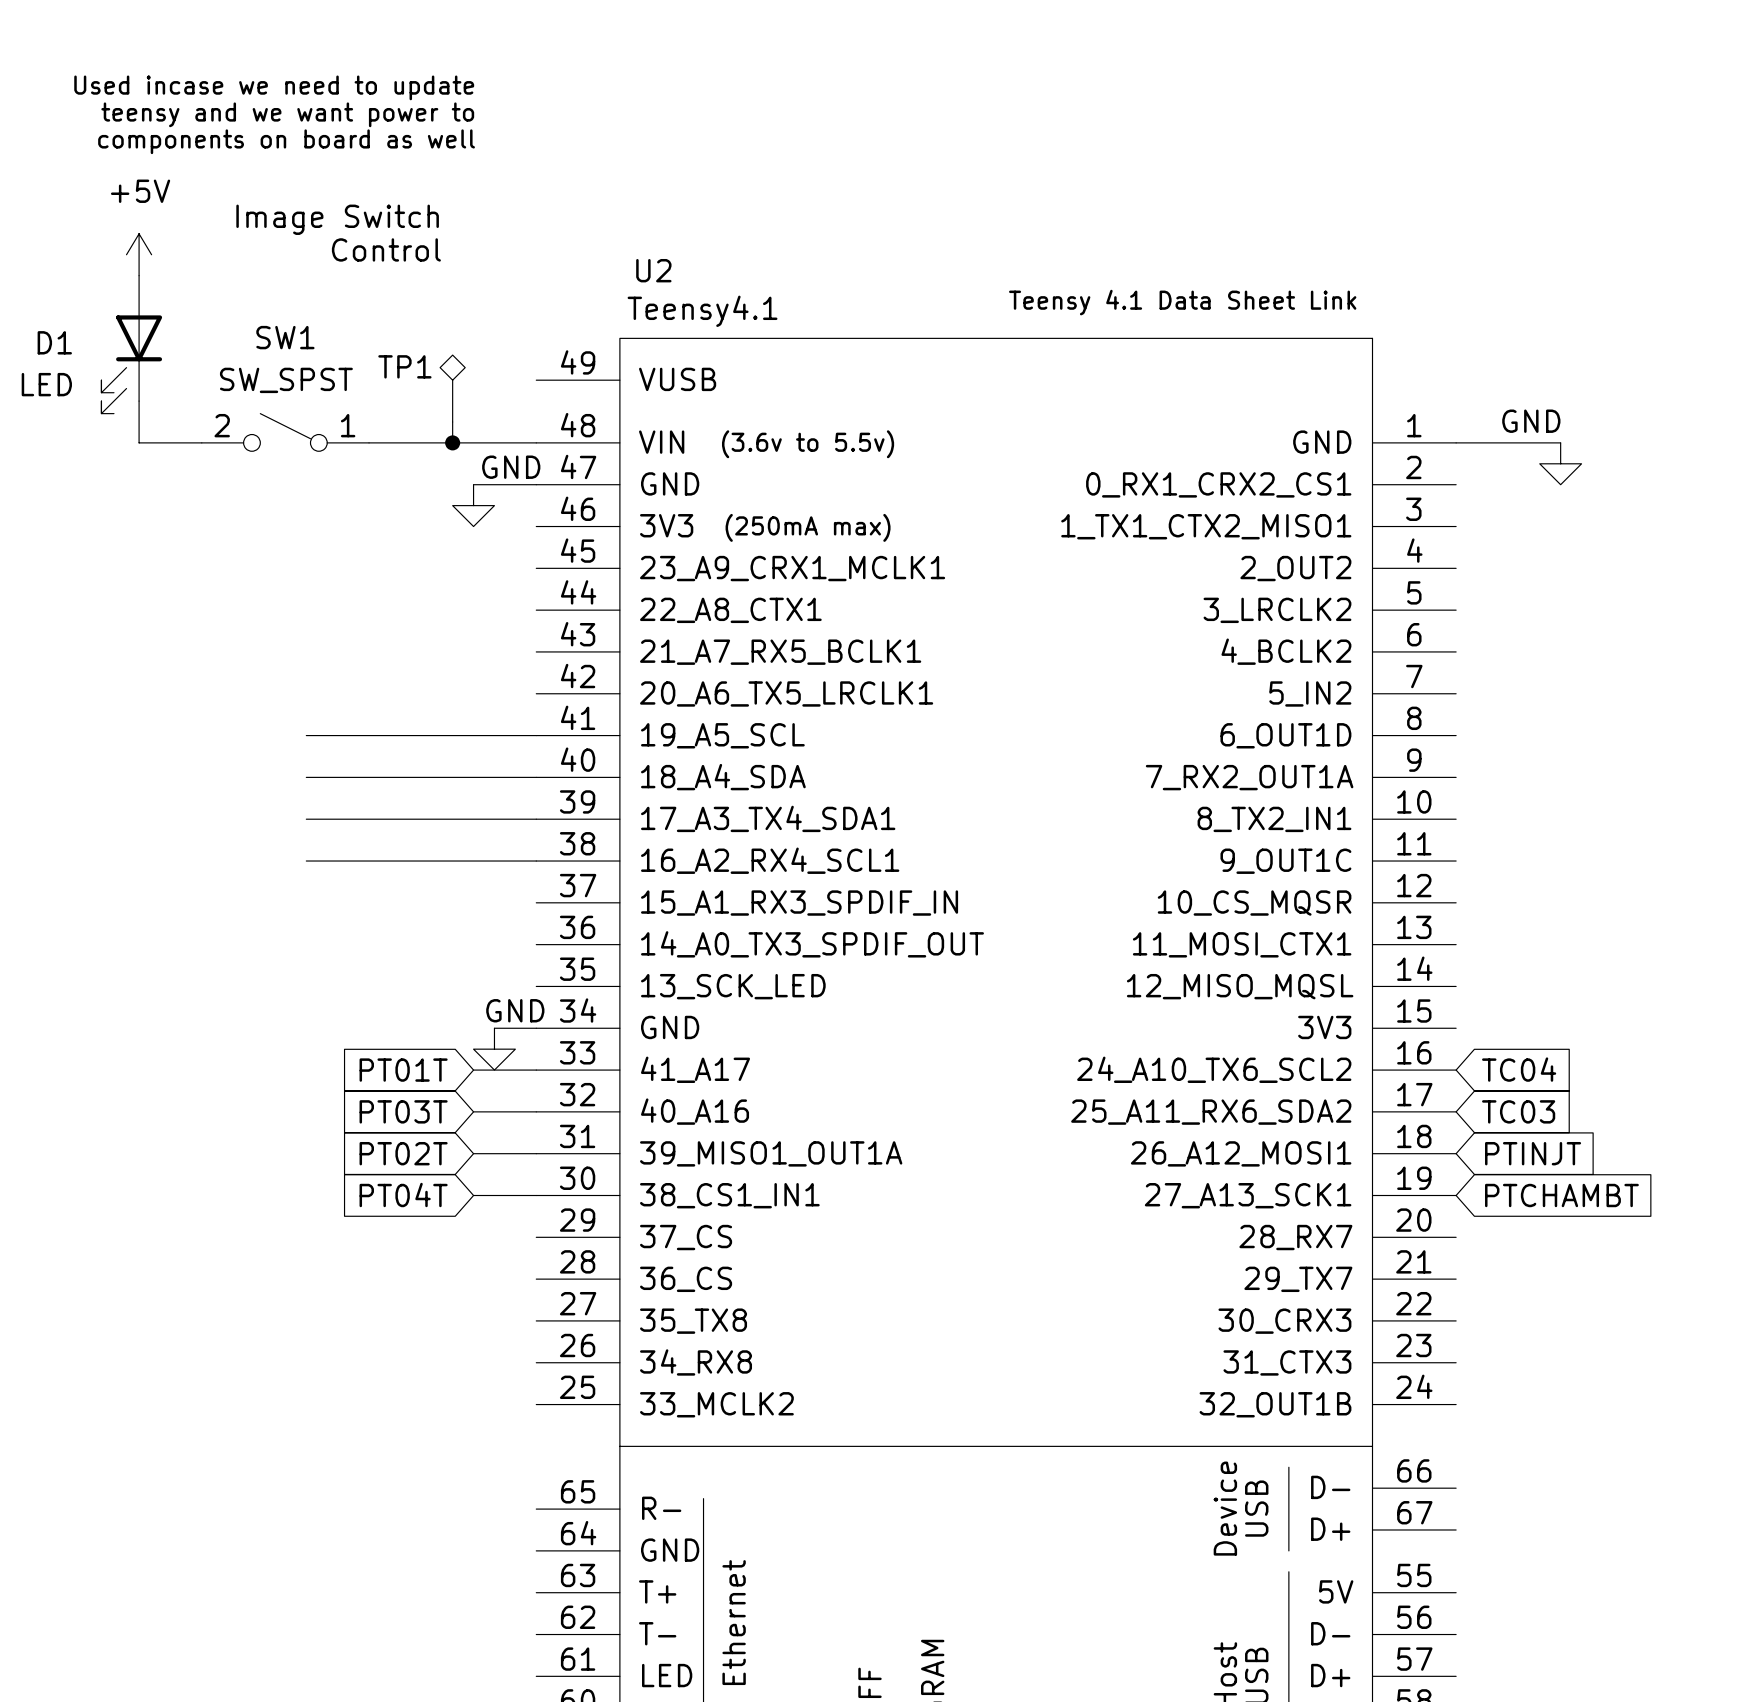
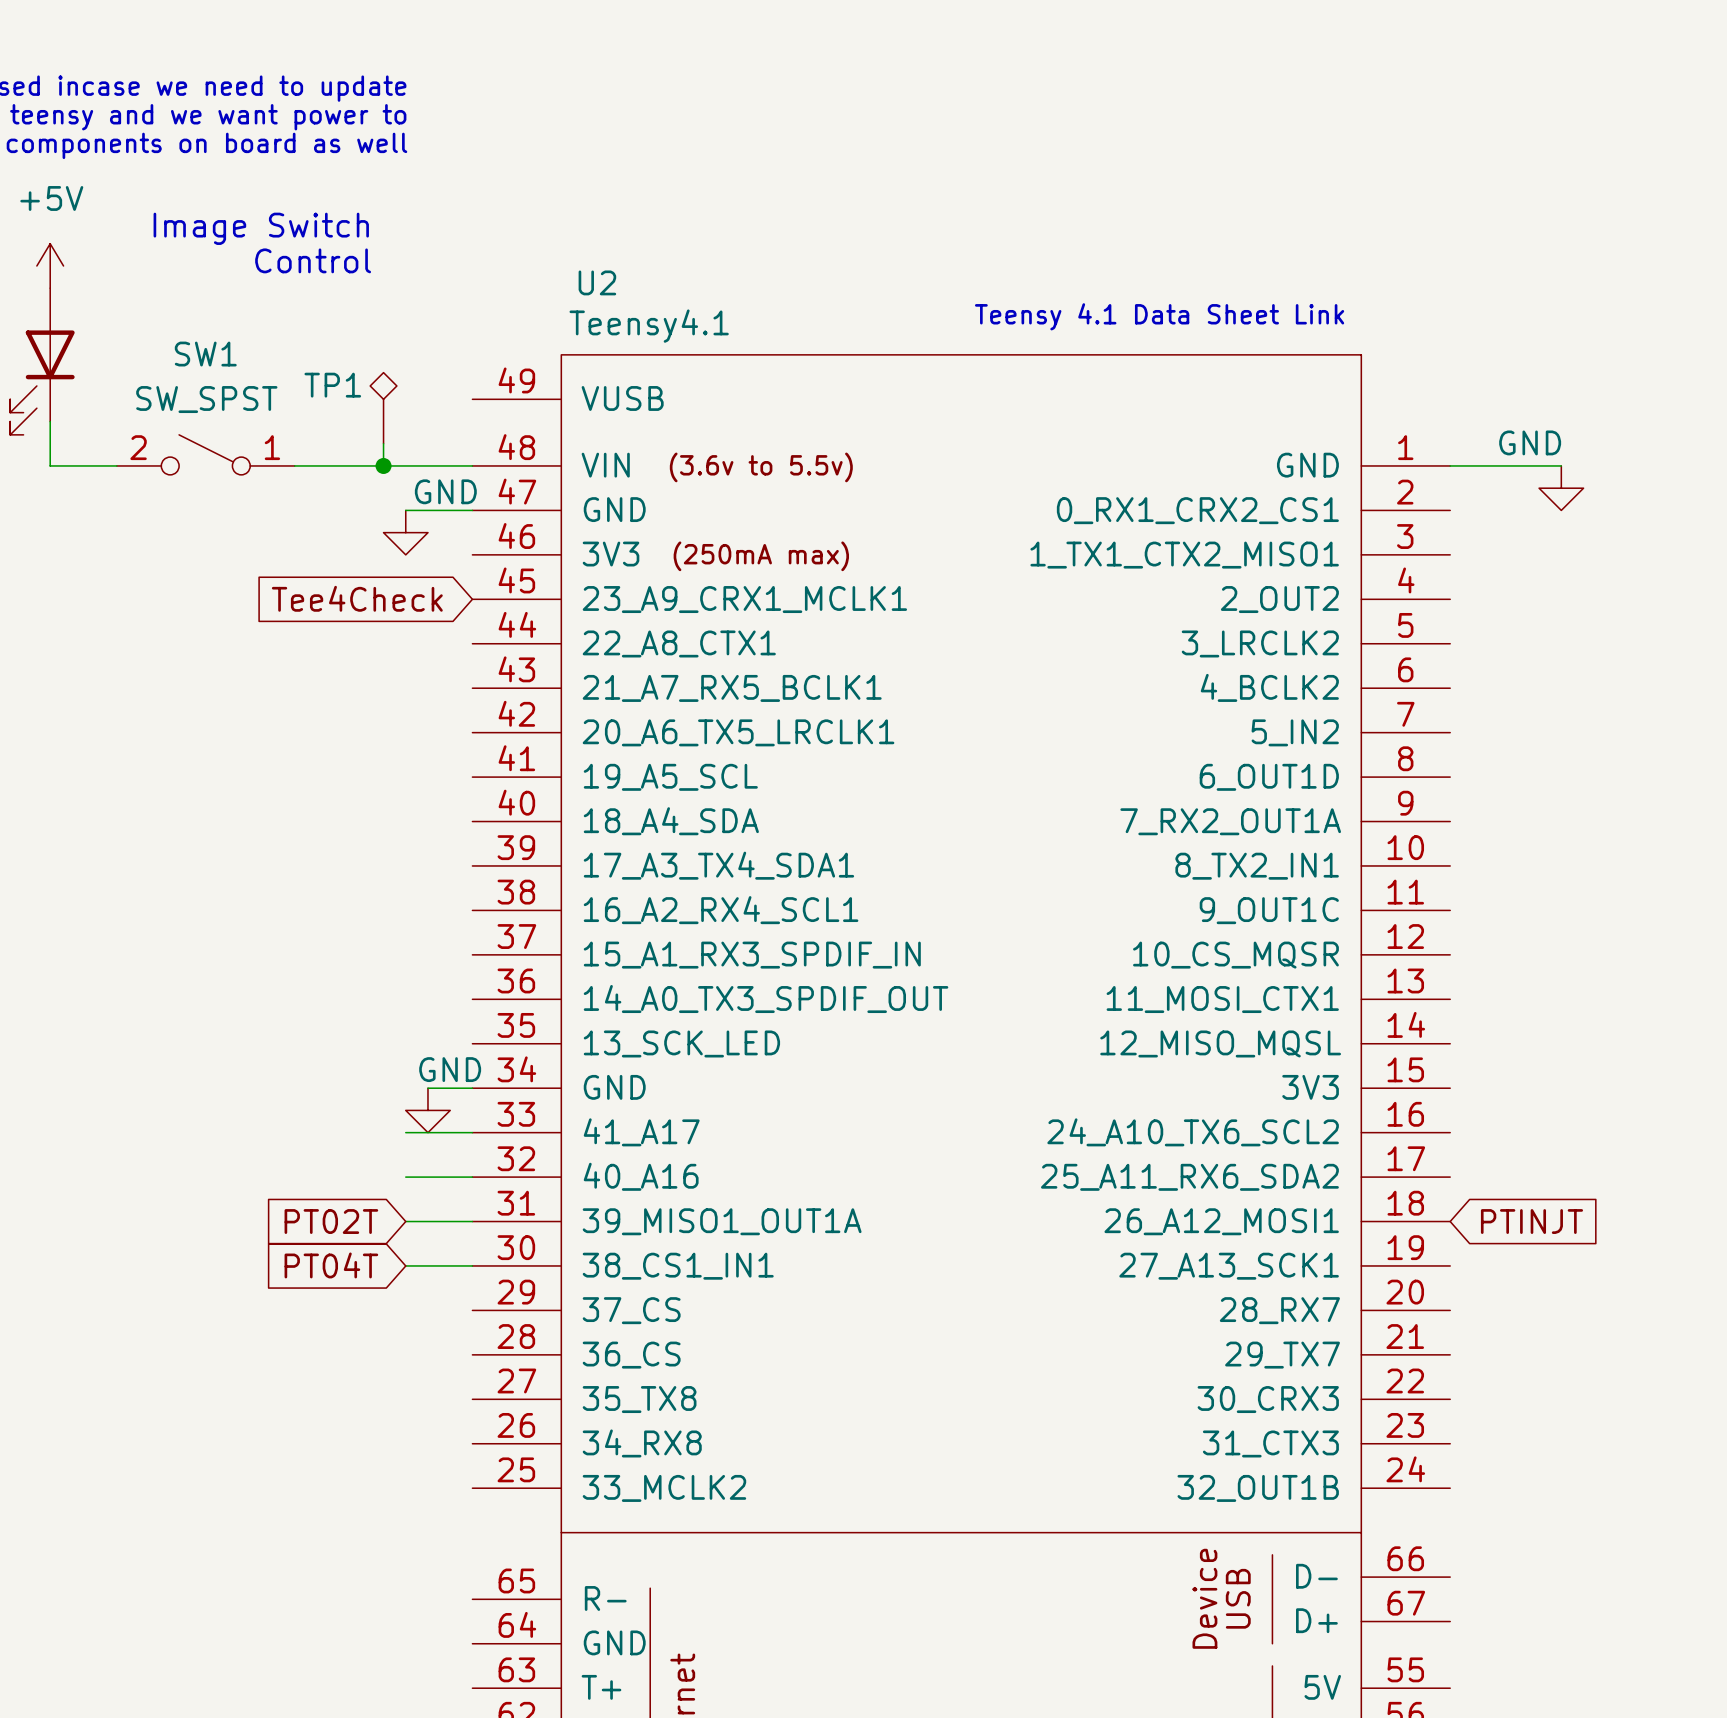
global label: none -> Tee4Check (357, 598)
wire: (306, 735) (536, 735) -> none
wire: (306, 777) (536, 777) -> none
wire: (306, 819) (536, 819) -> none
wire: (306, 861) (536, 861) -> none
global label: TC04 (1519, 1069) -> none
global label: PT01T (403, 1070) -> none
global label: PT03T (403, 1111) -> none
global label: TC03 (1518, 1111) -> none
global label: PTCHAMBT (1561, 1195) -> none

